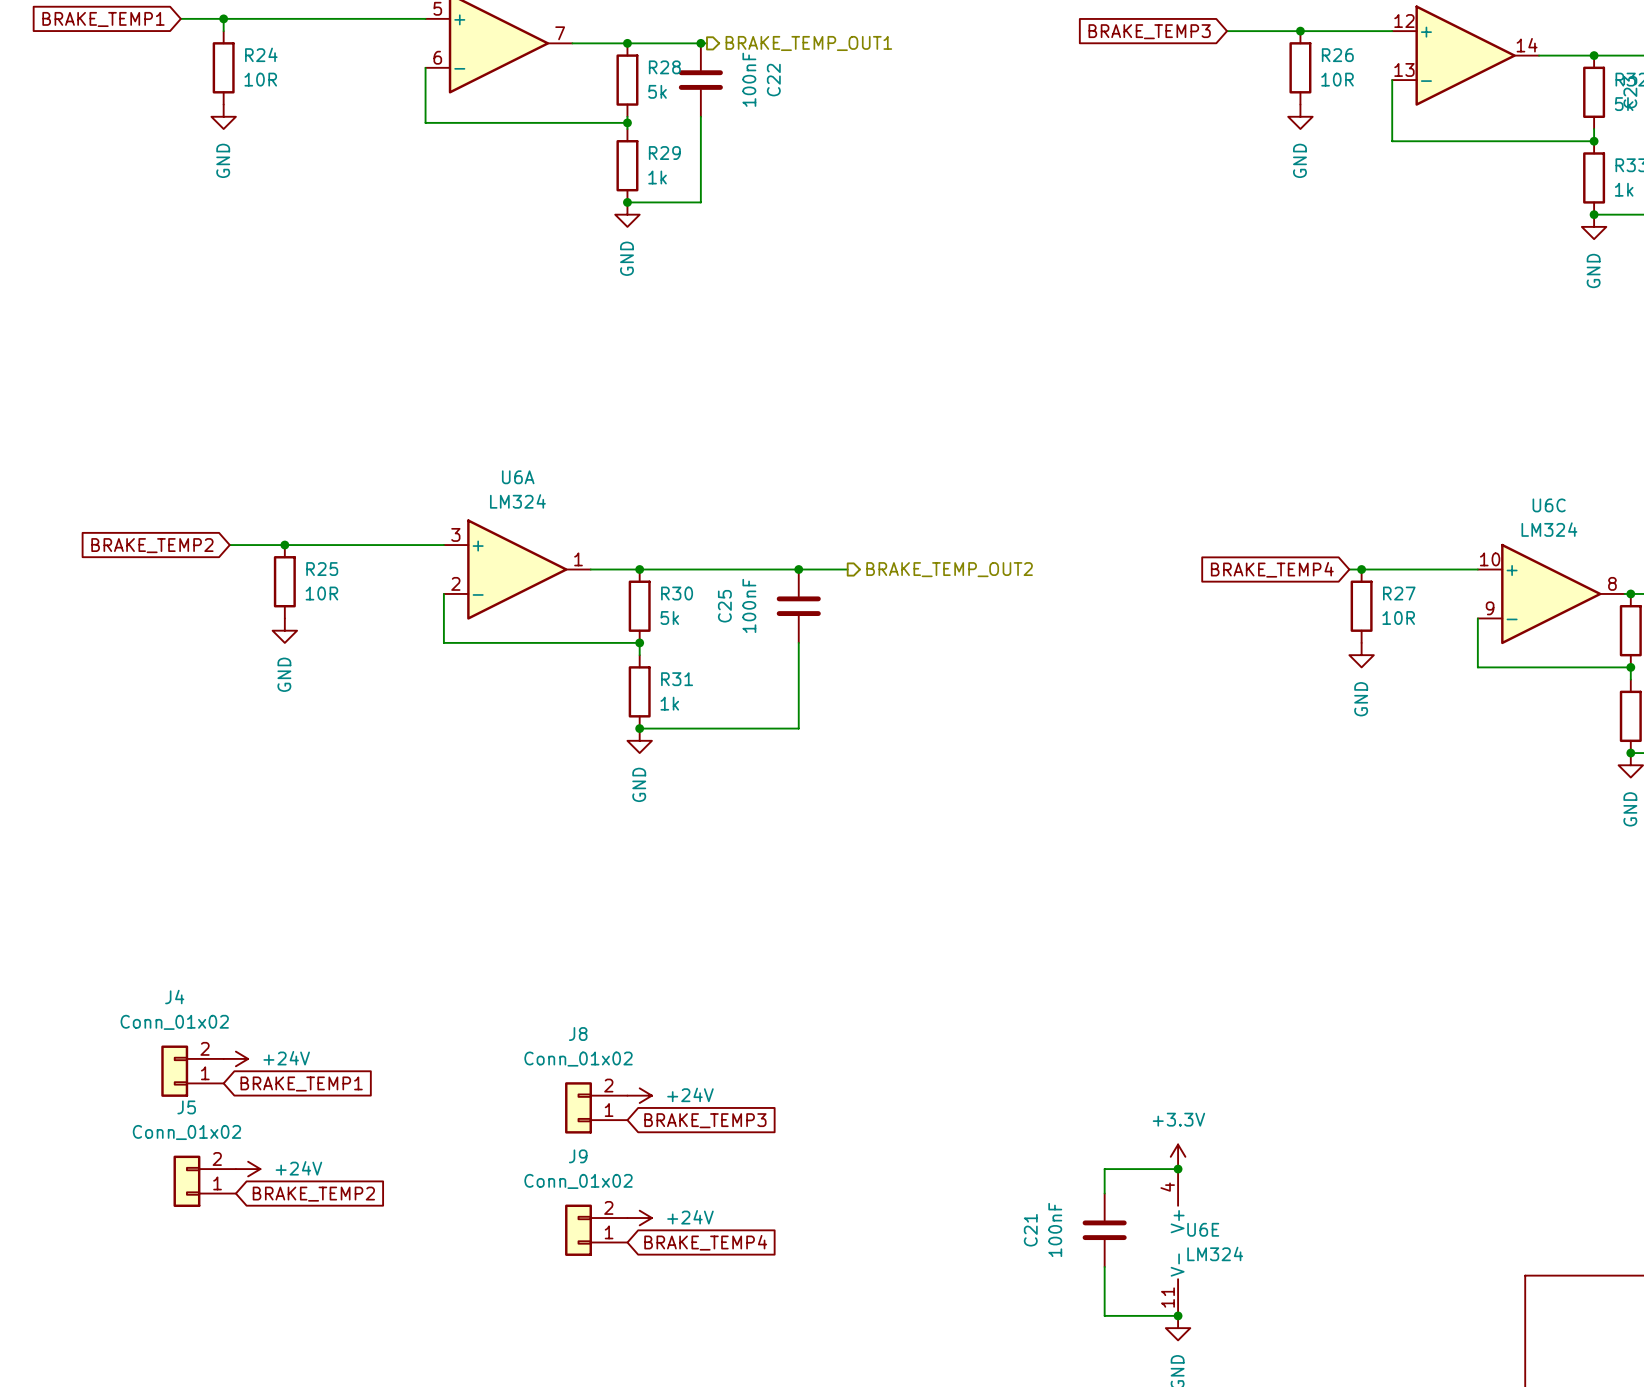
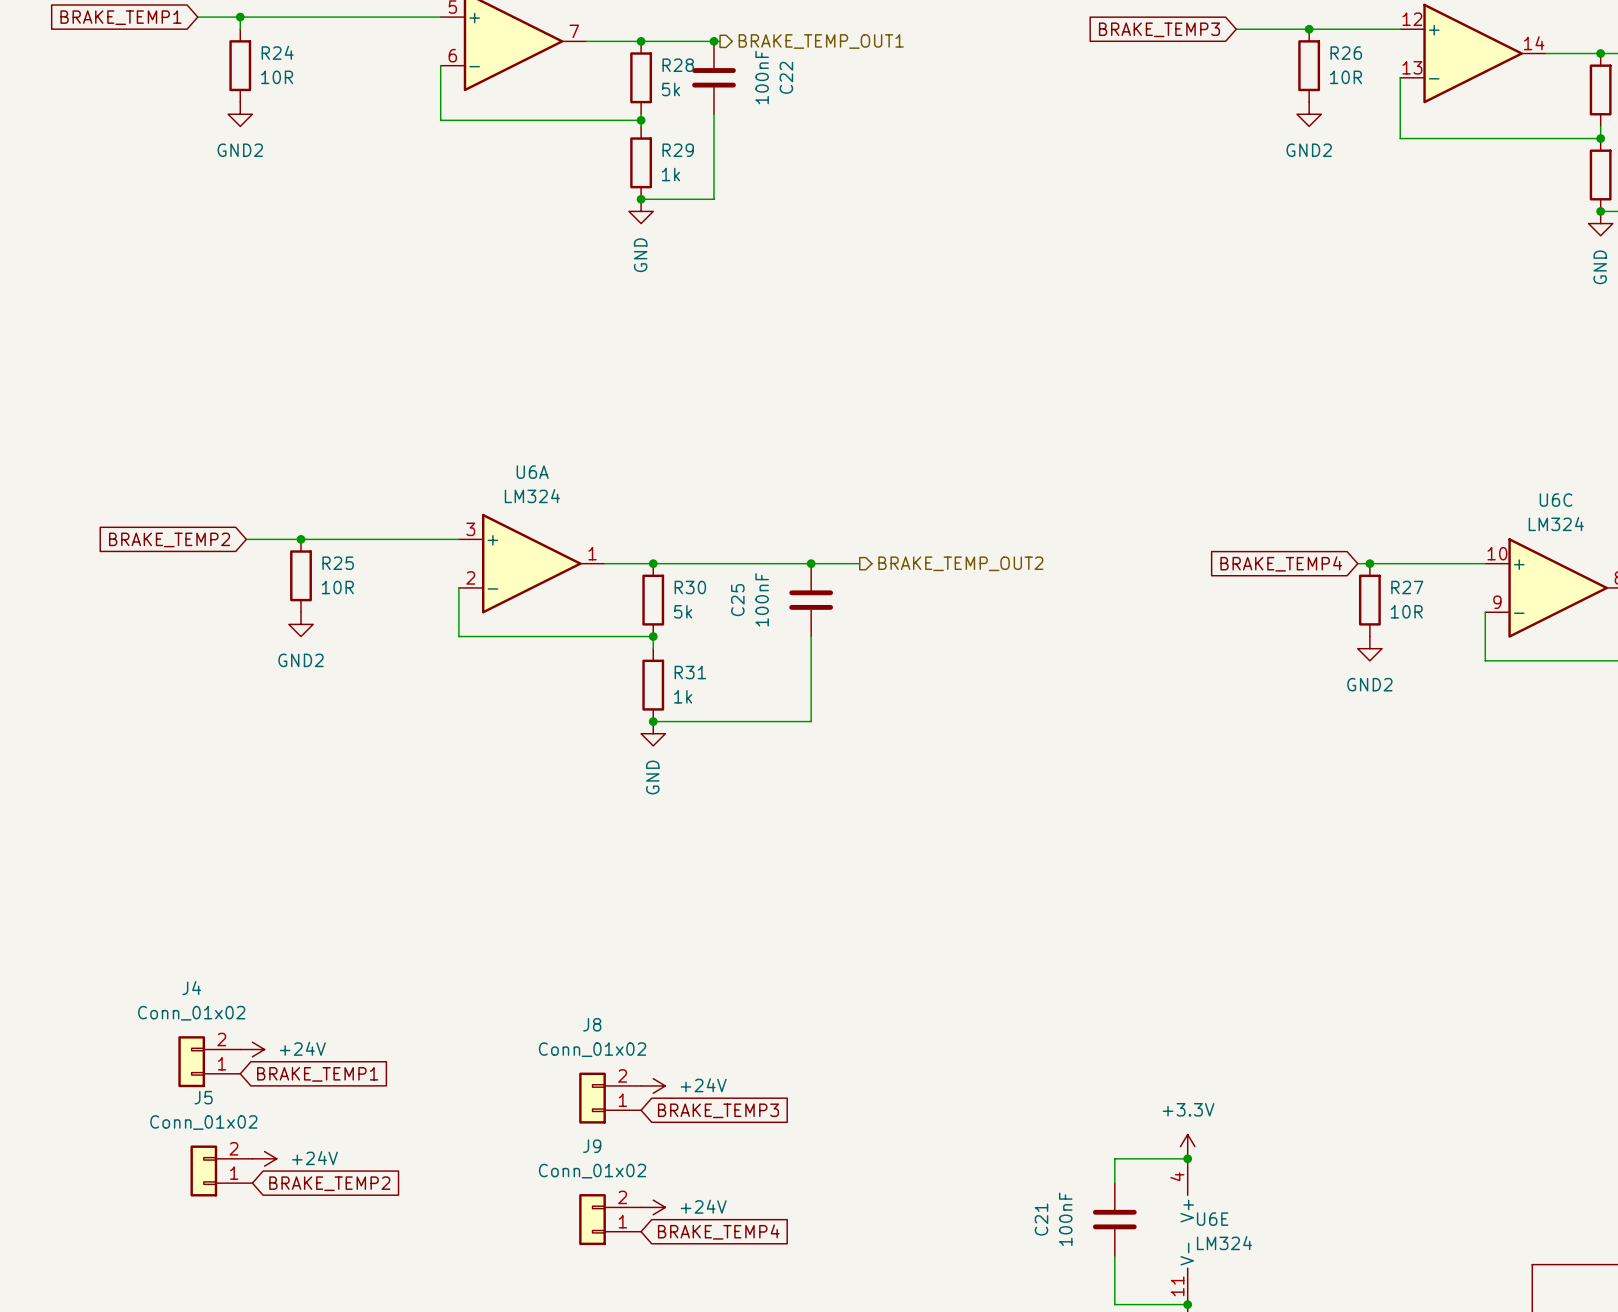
power symbol: GND (223, 116) -> GND2 (240, 114)
power symbol: GND (1300, 116) -> GND2 (1309, 114)
power symbol: GND (284, 630) -> GND2 (301, 624)
power symbol: GND (1361, 655) -> GND2 (1369, 648)

